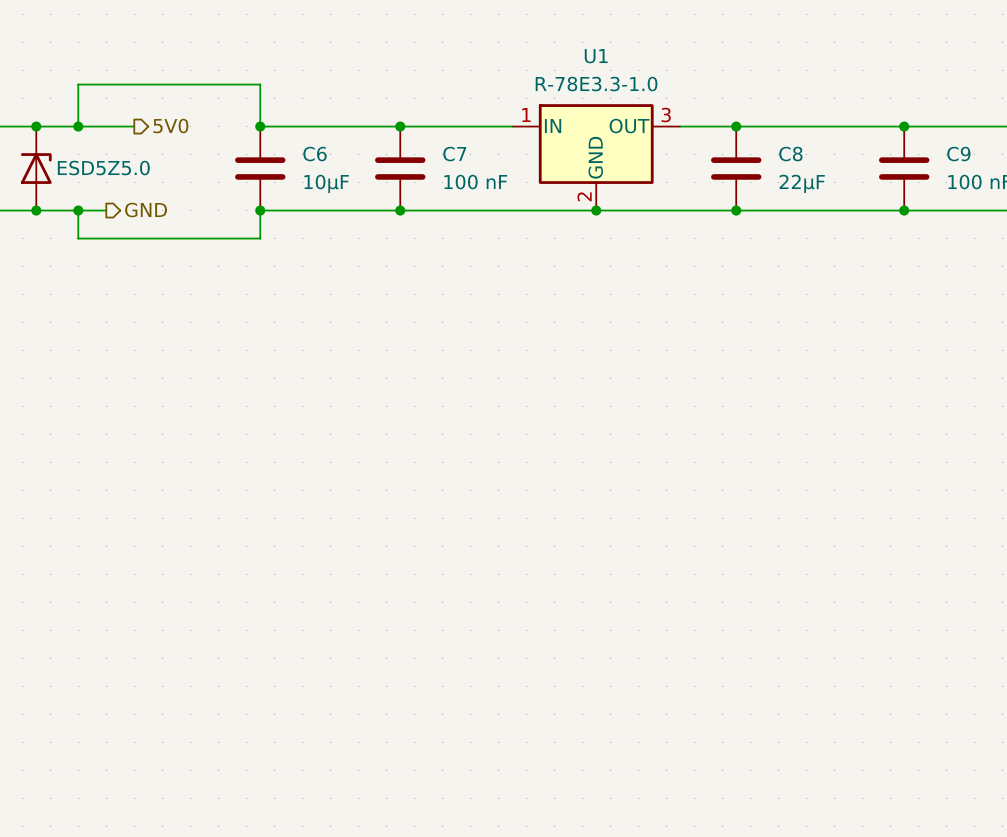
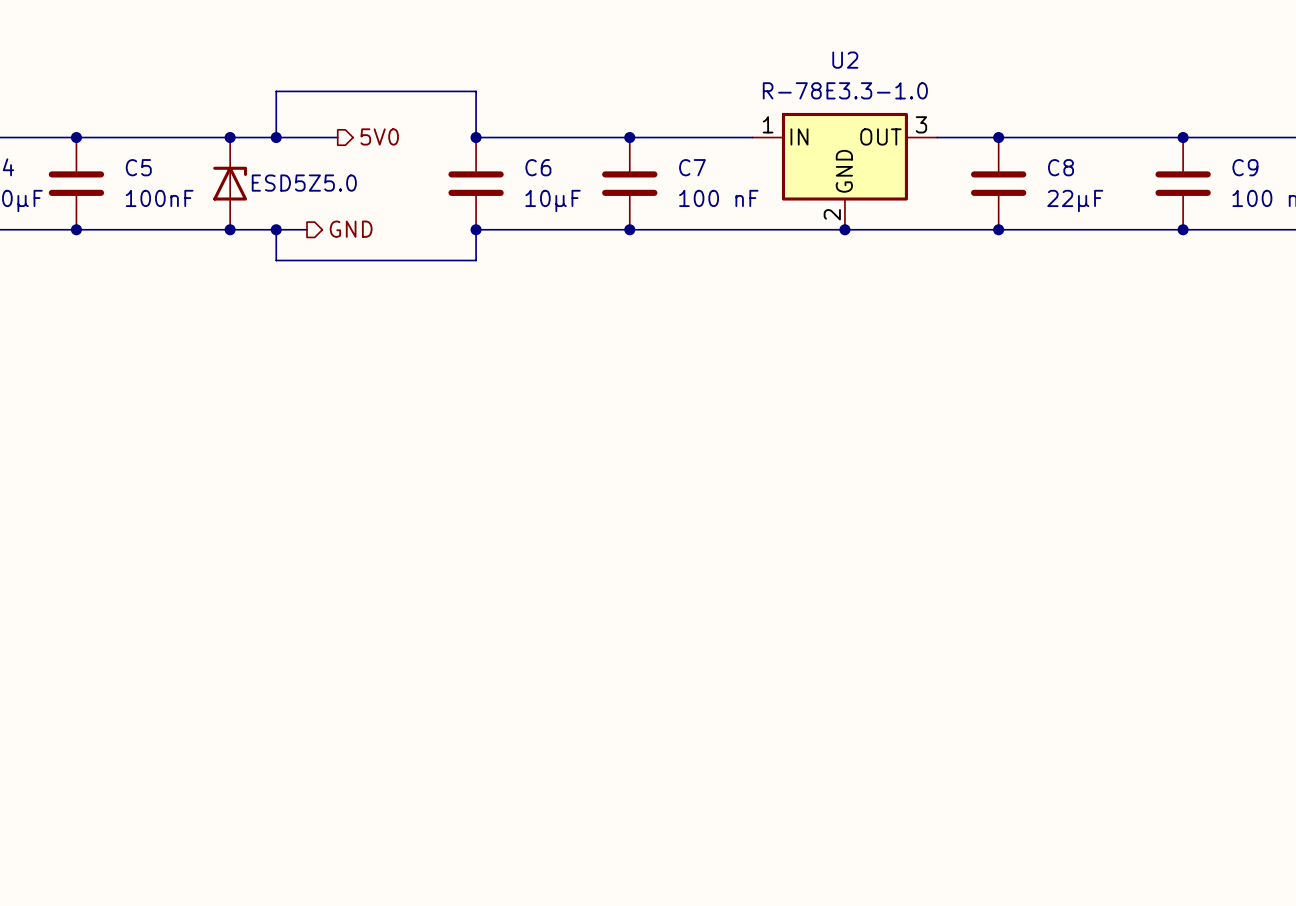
U1 name: U1 (596, 56) -> U2 (845, 60)

